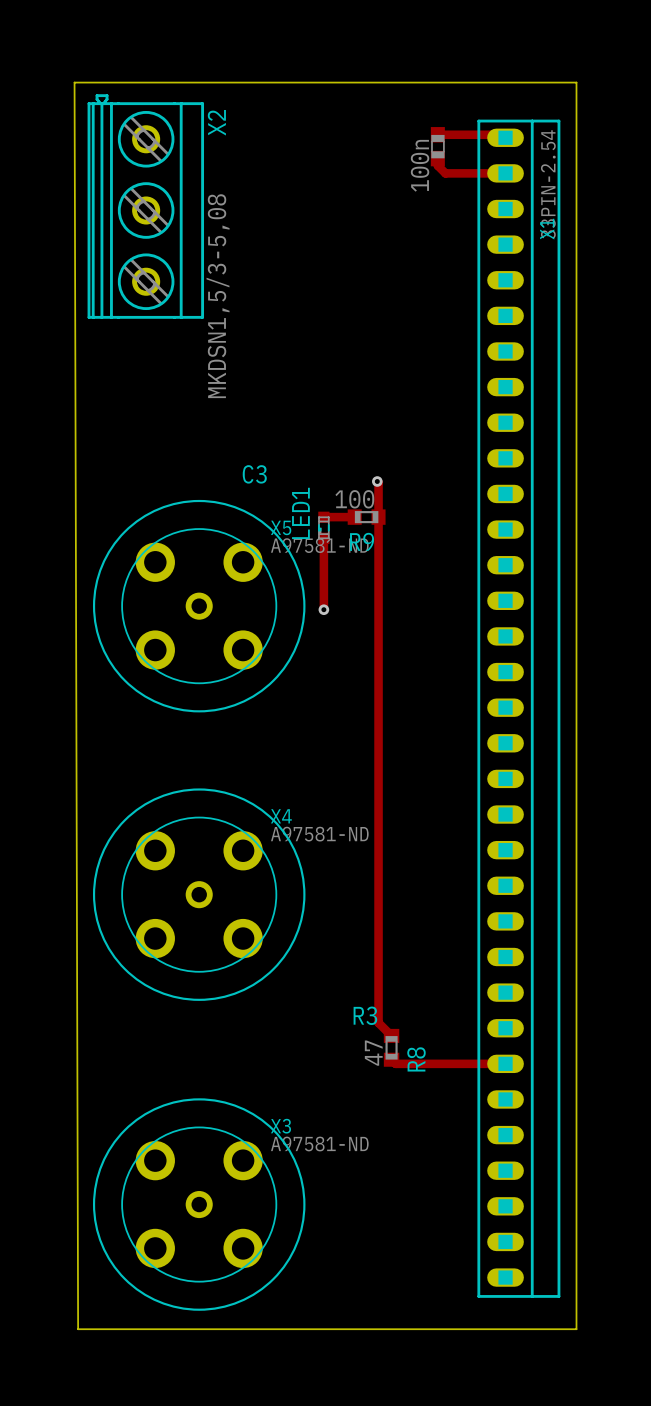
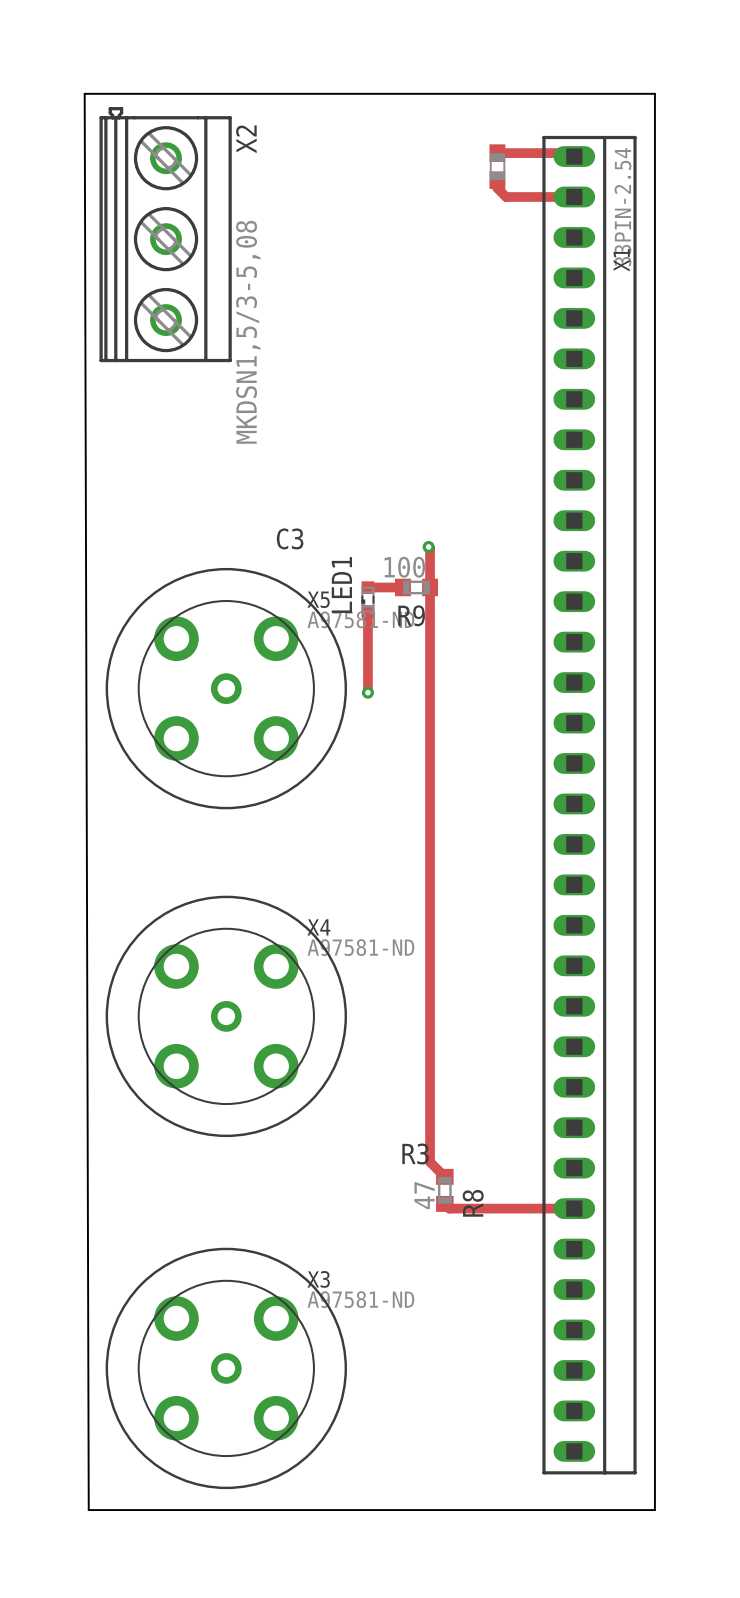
part value: 100n (420, 165) -> none

